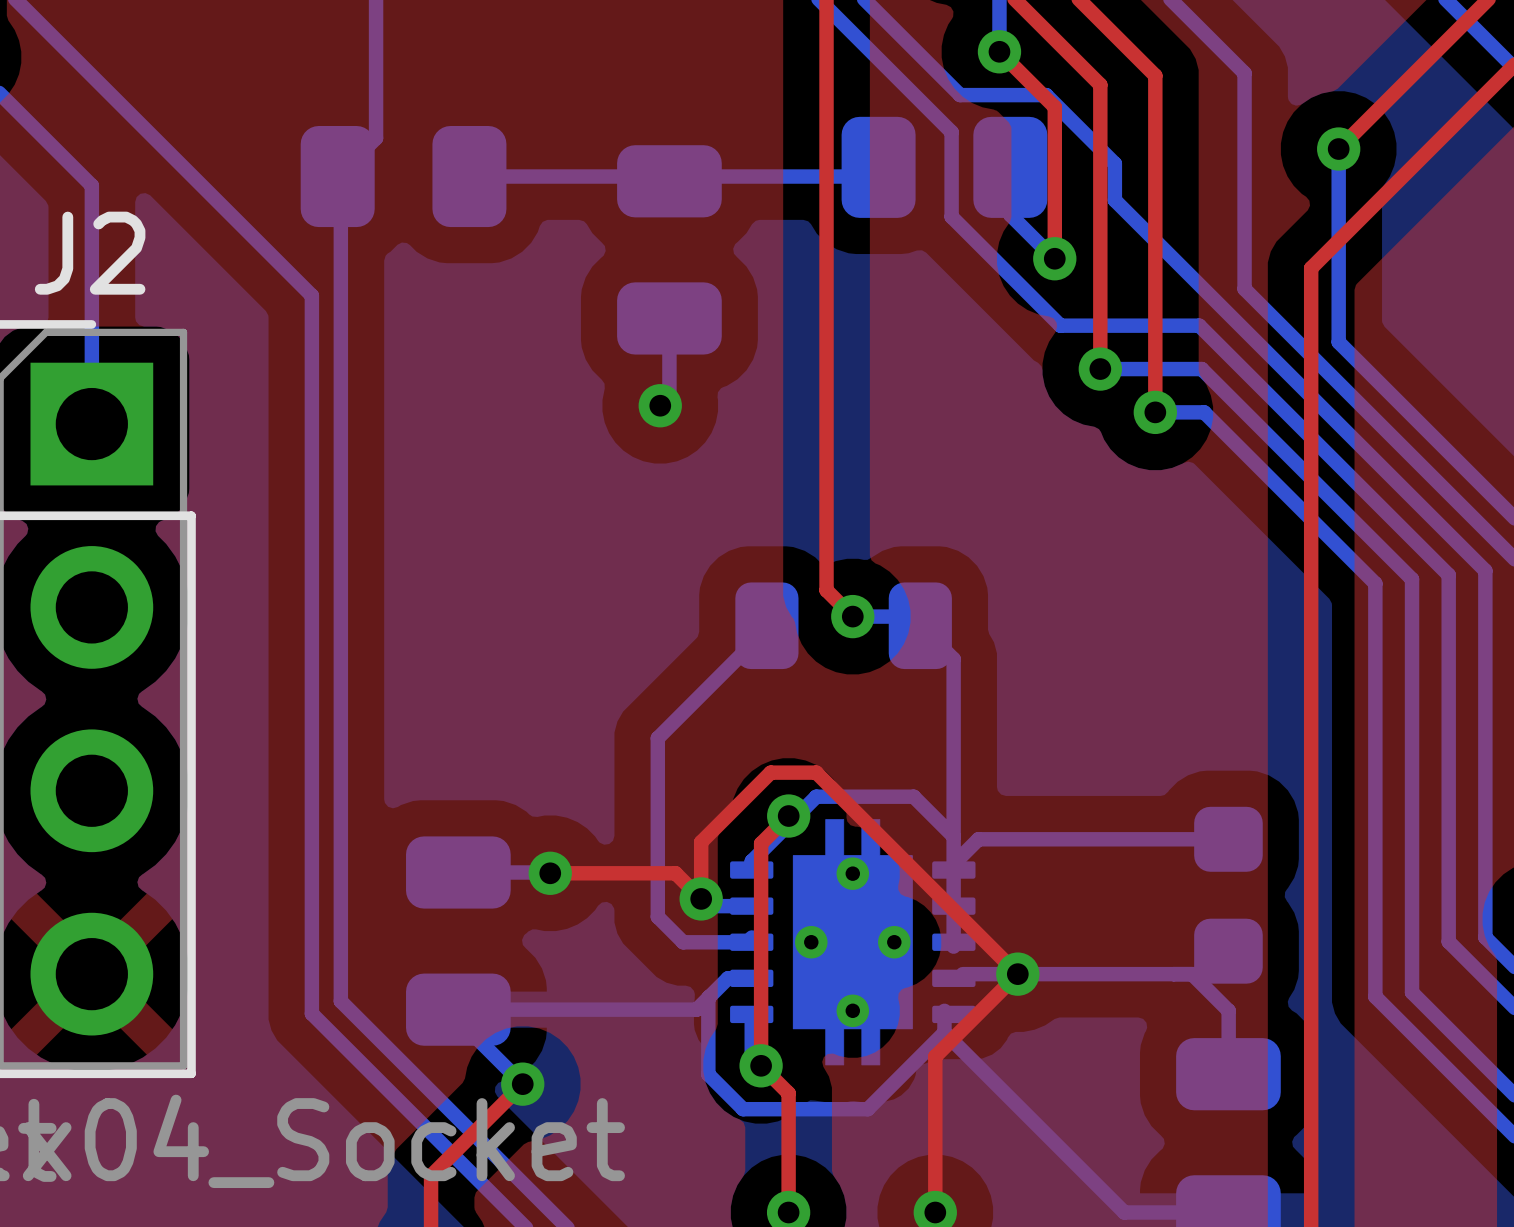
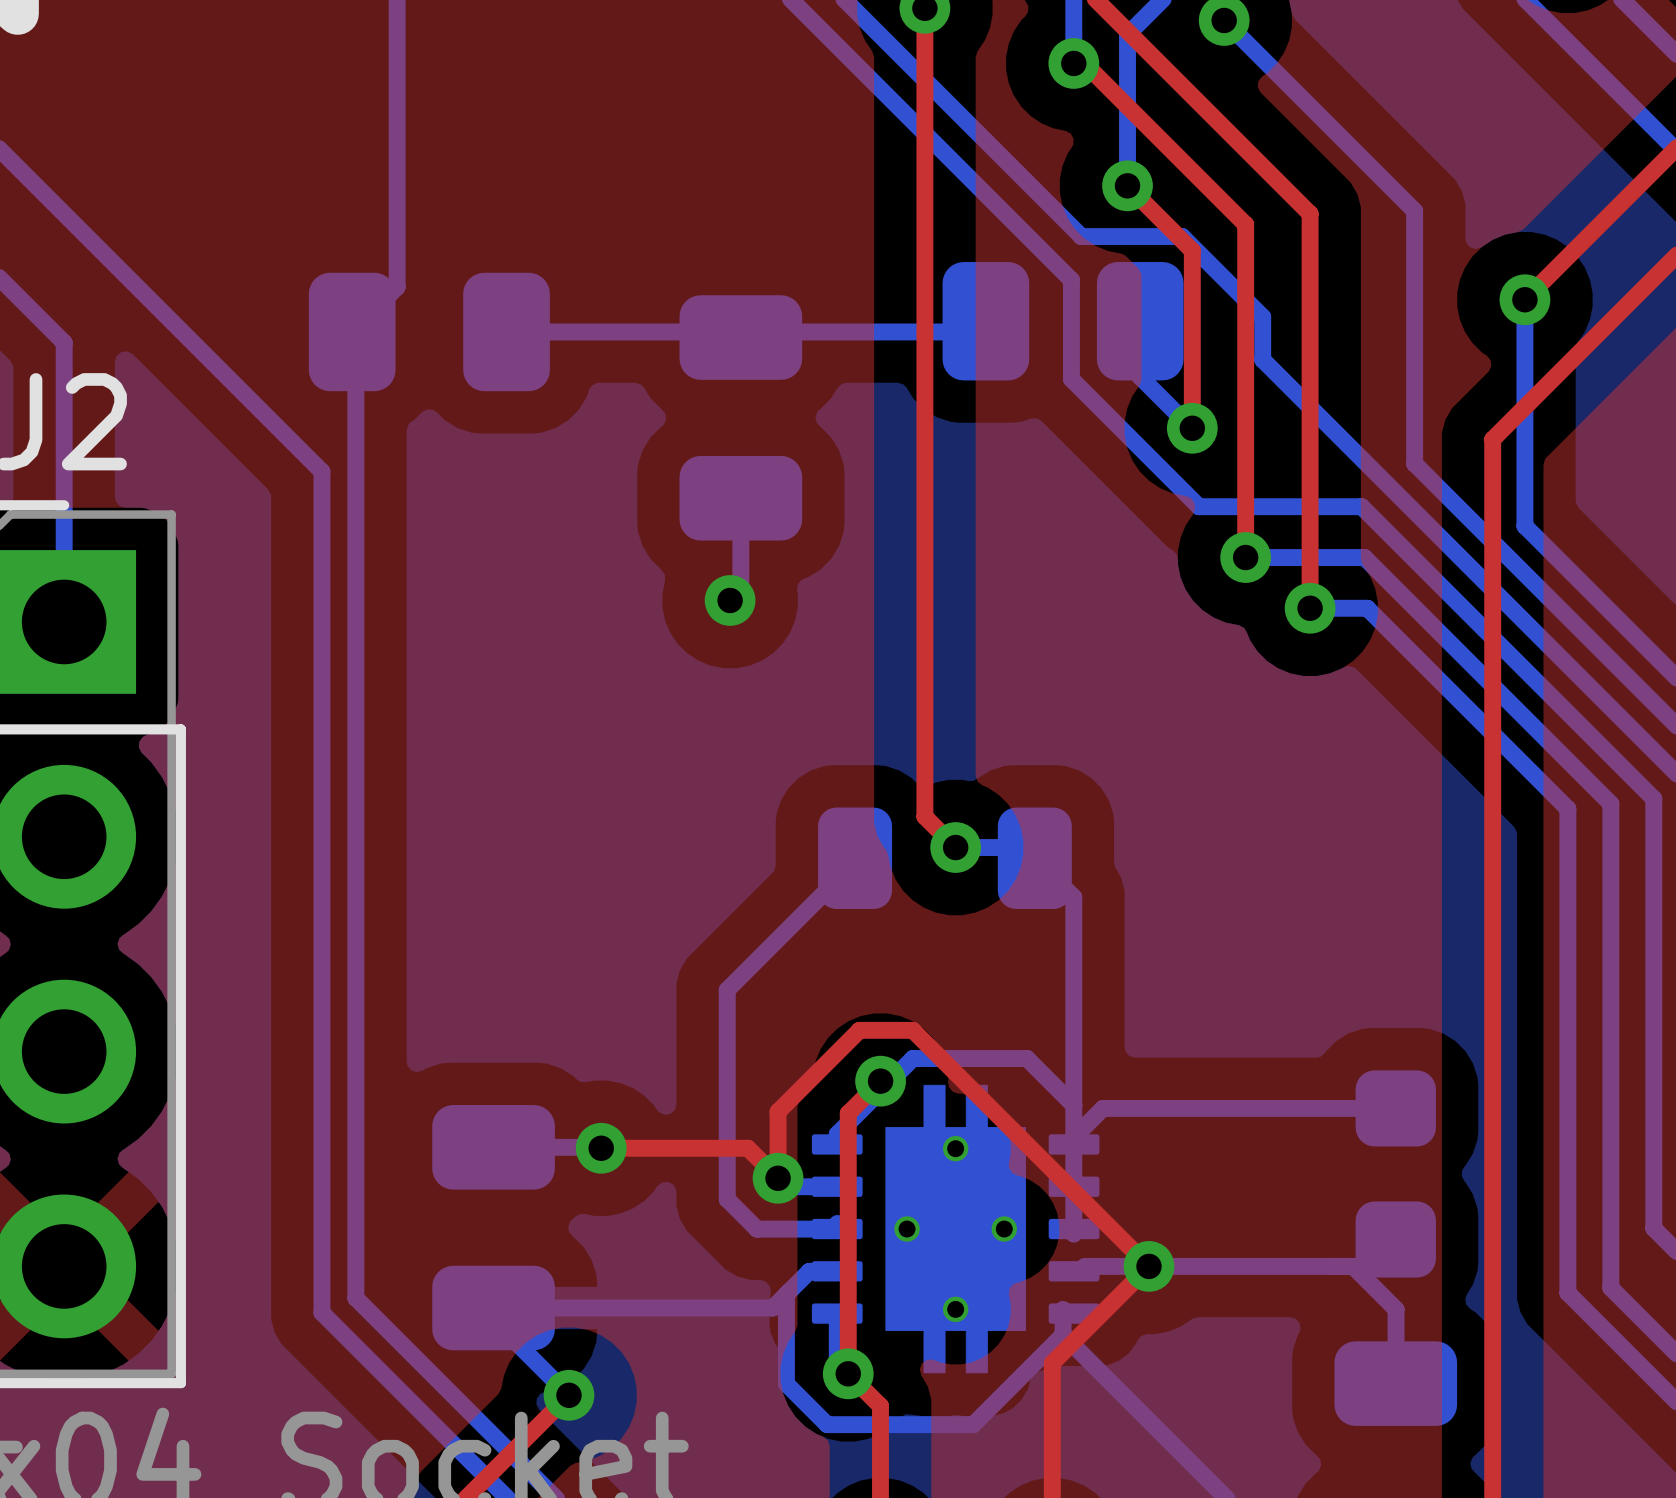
part footprint: [730, 819, 976, 1066] -> [811, 1084, 1100, 1374]

